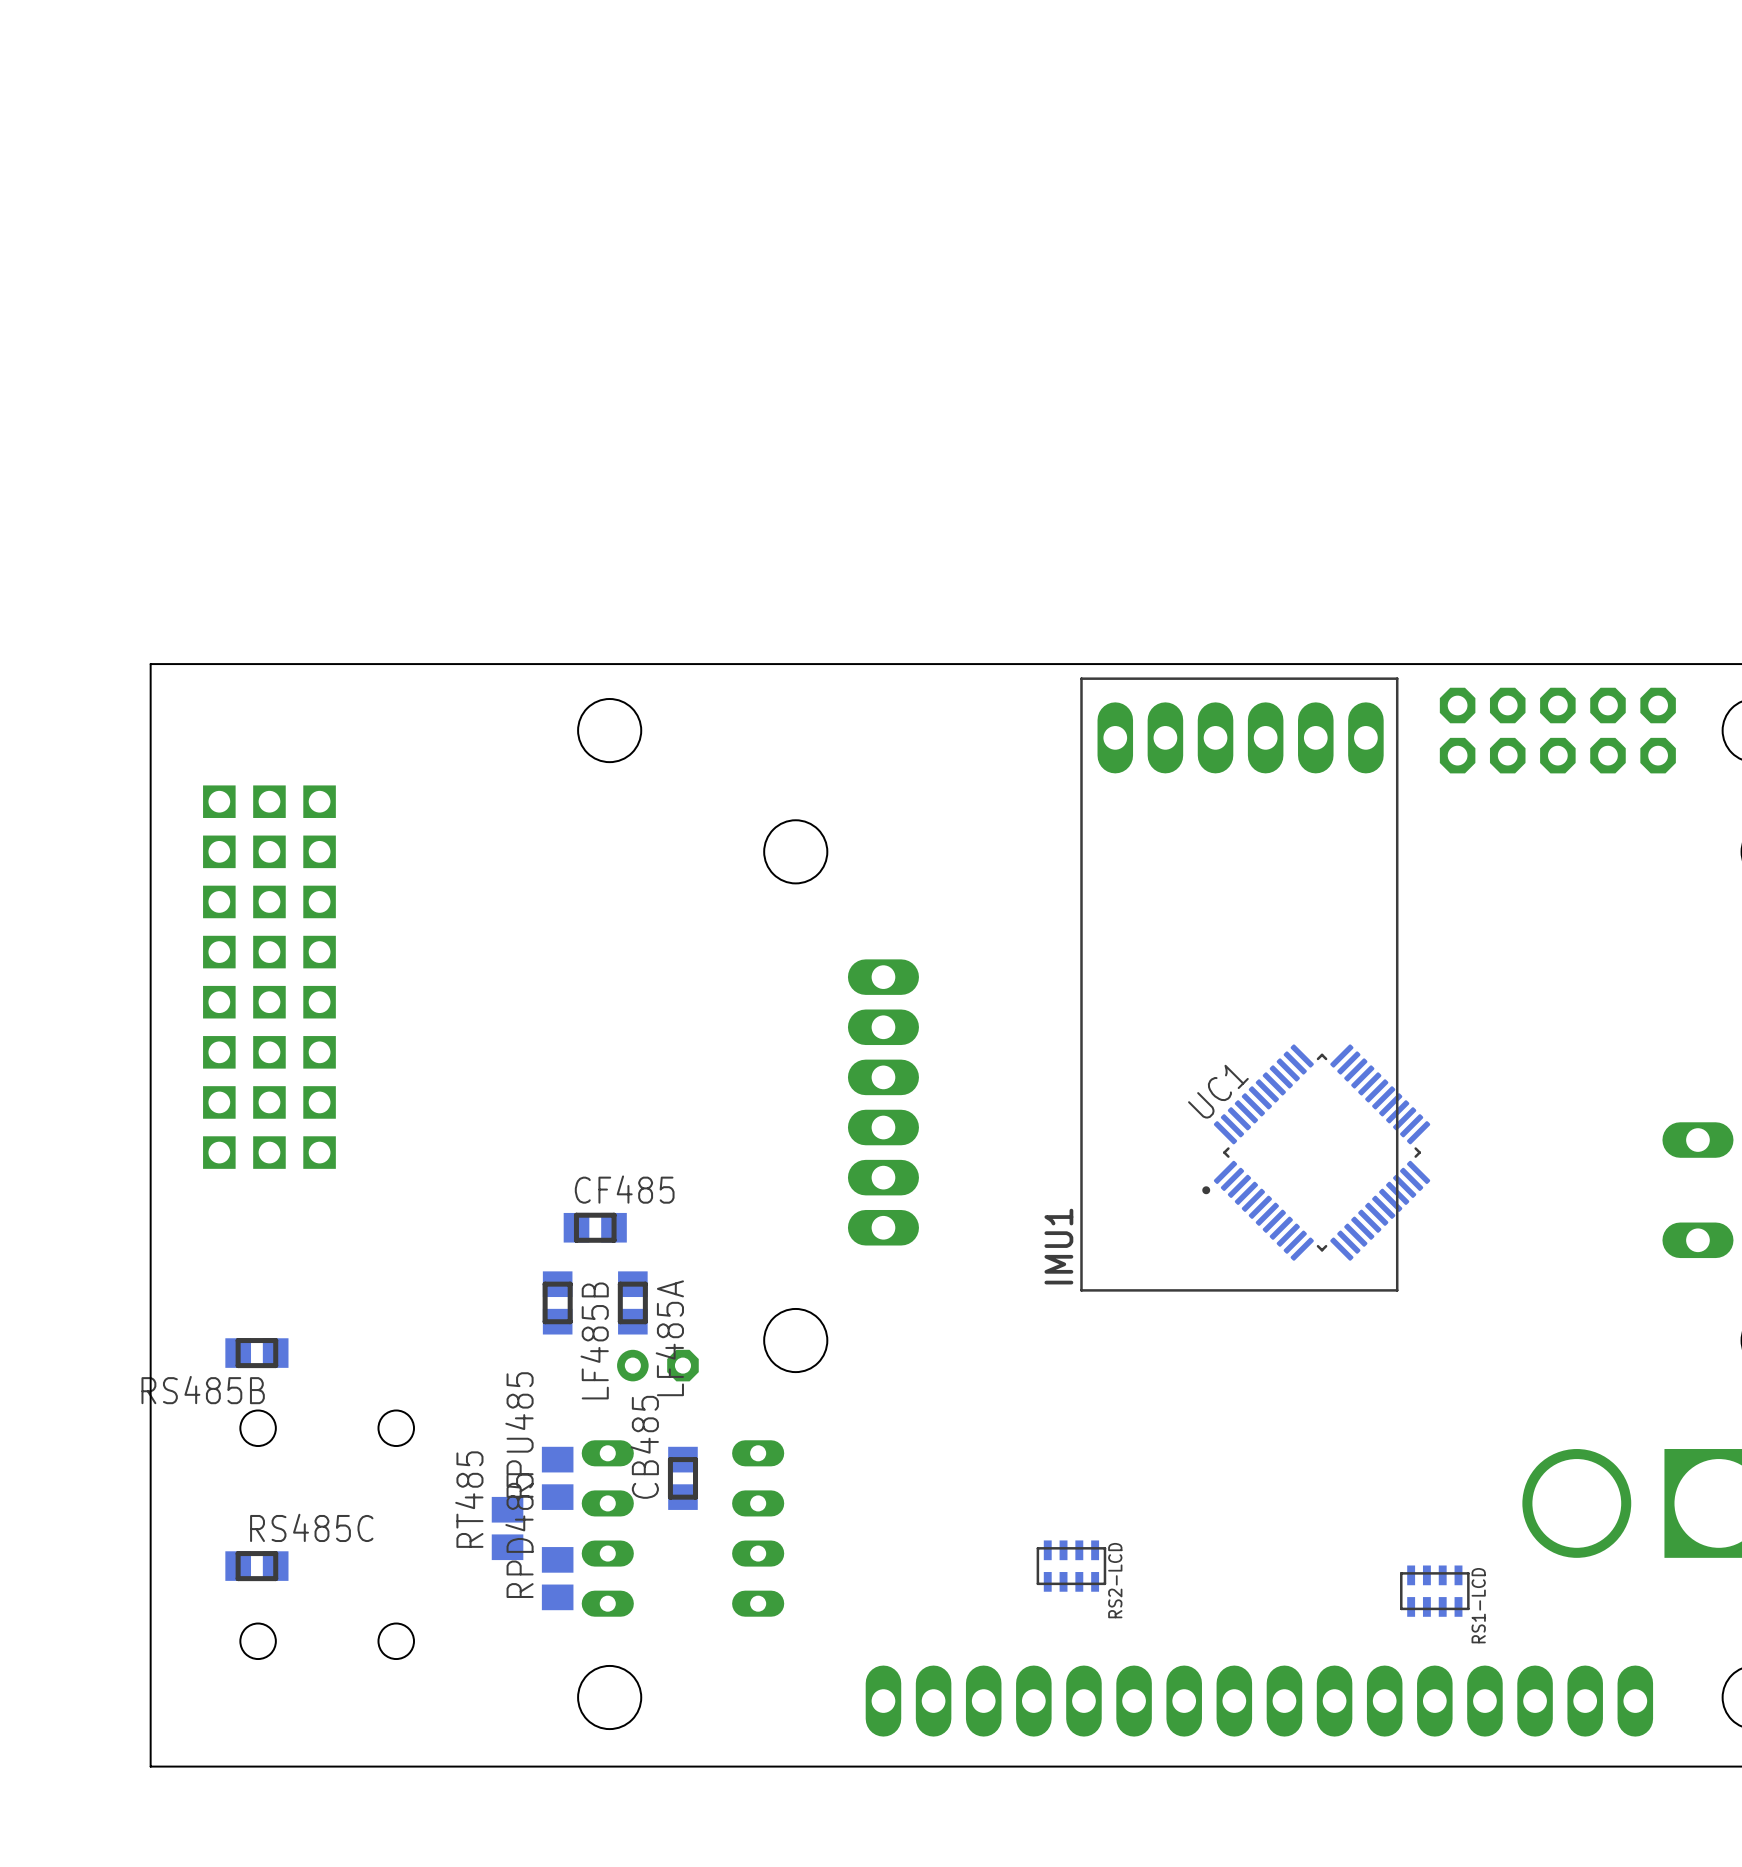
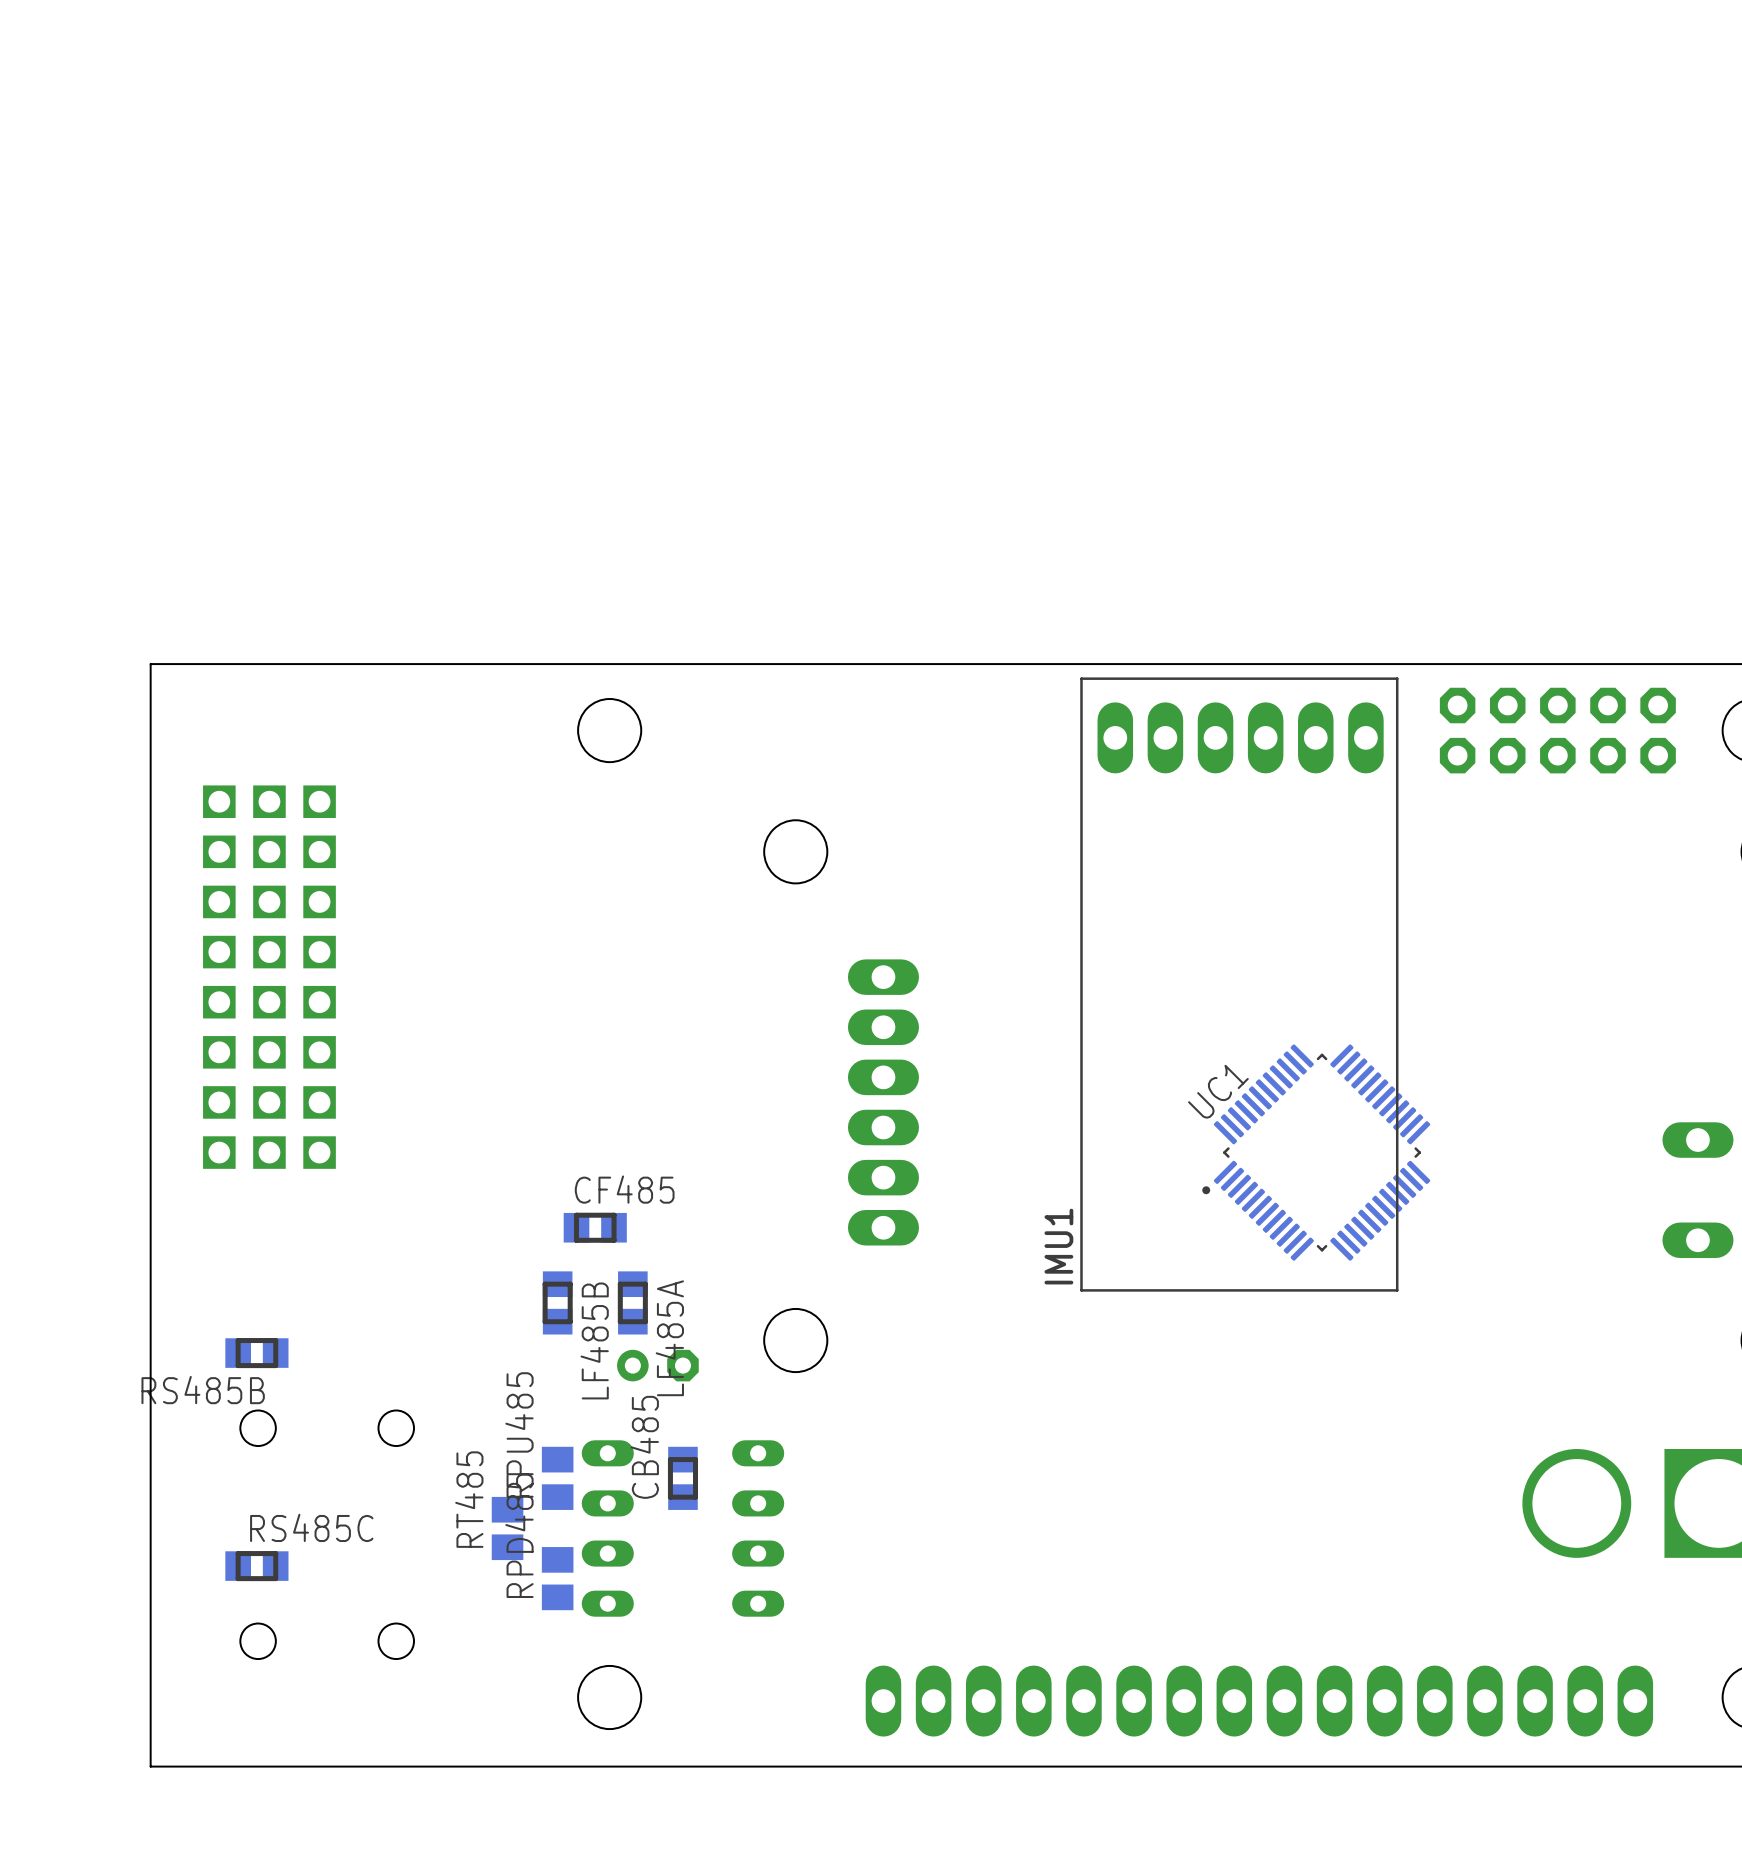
RS2-LCD: (1071, 1566) -> none
RS1-LCD: (1434, 1591) -> none

